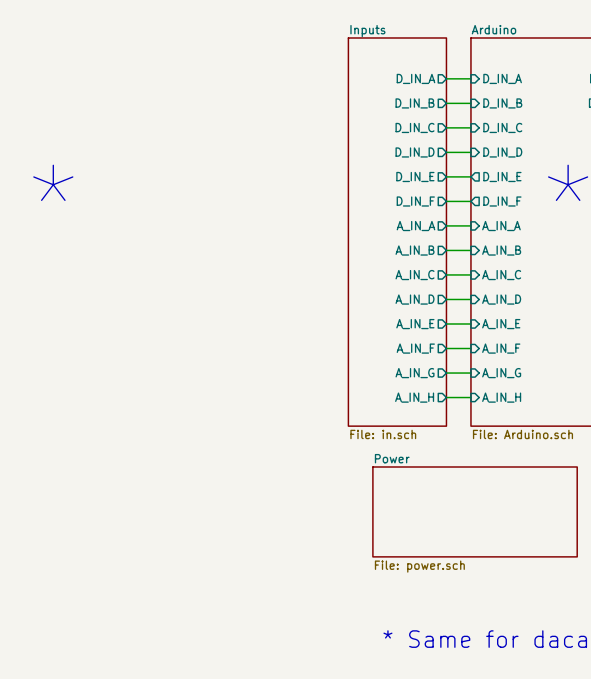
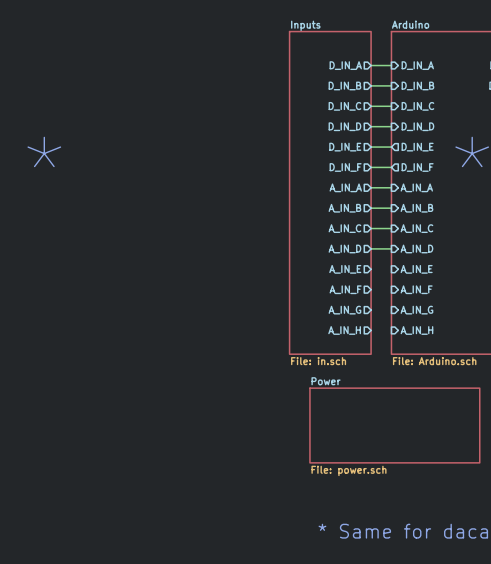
wire: (446, 323) (470, 323) -> none
wire: (446, 348) (470, 348) -> none
wire: (446, 373) (470, 373) -> none
wire: (446, 397) (470, 397) -> none

